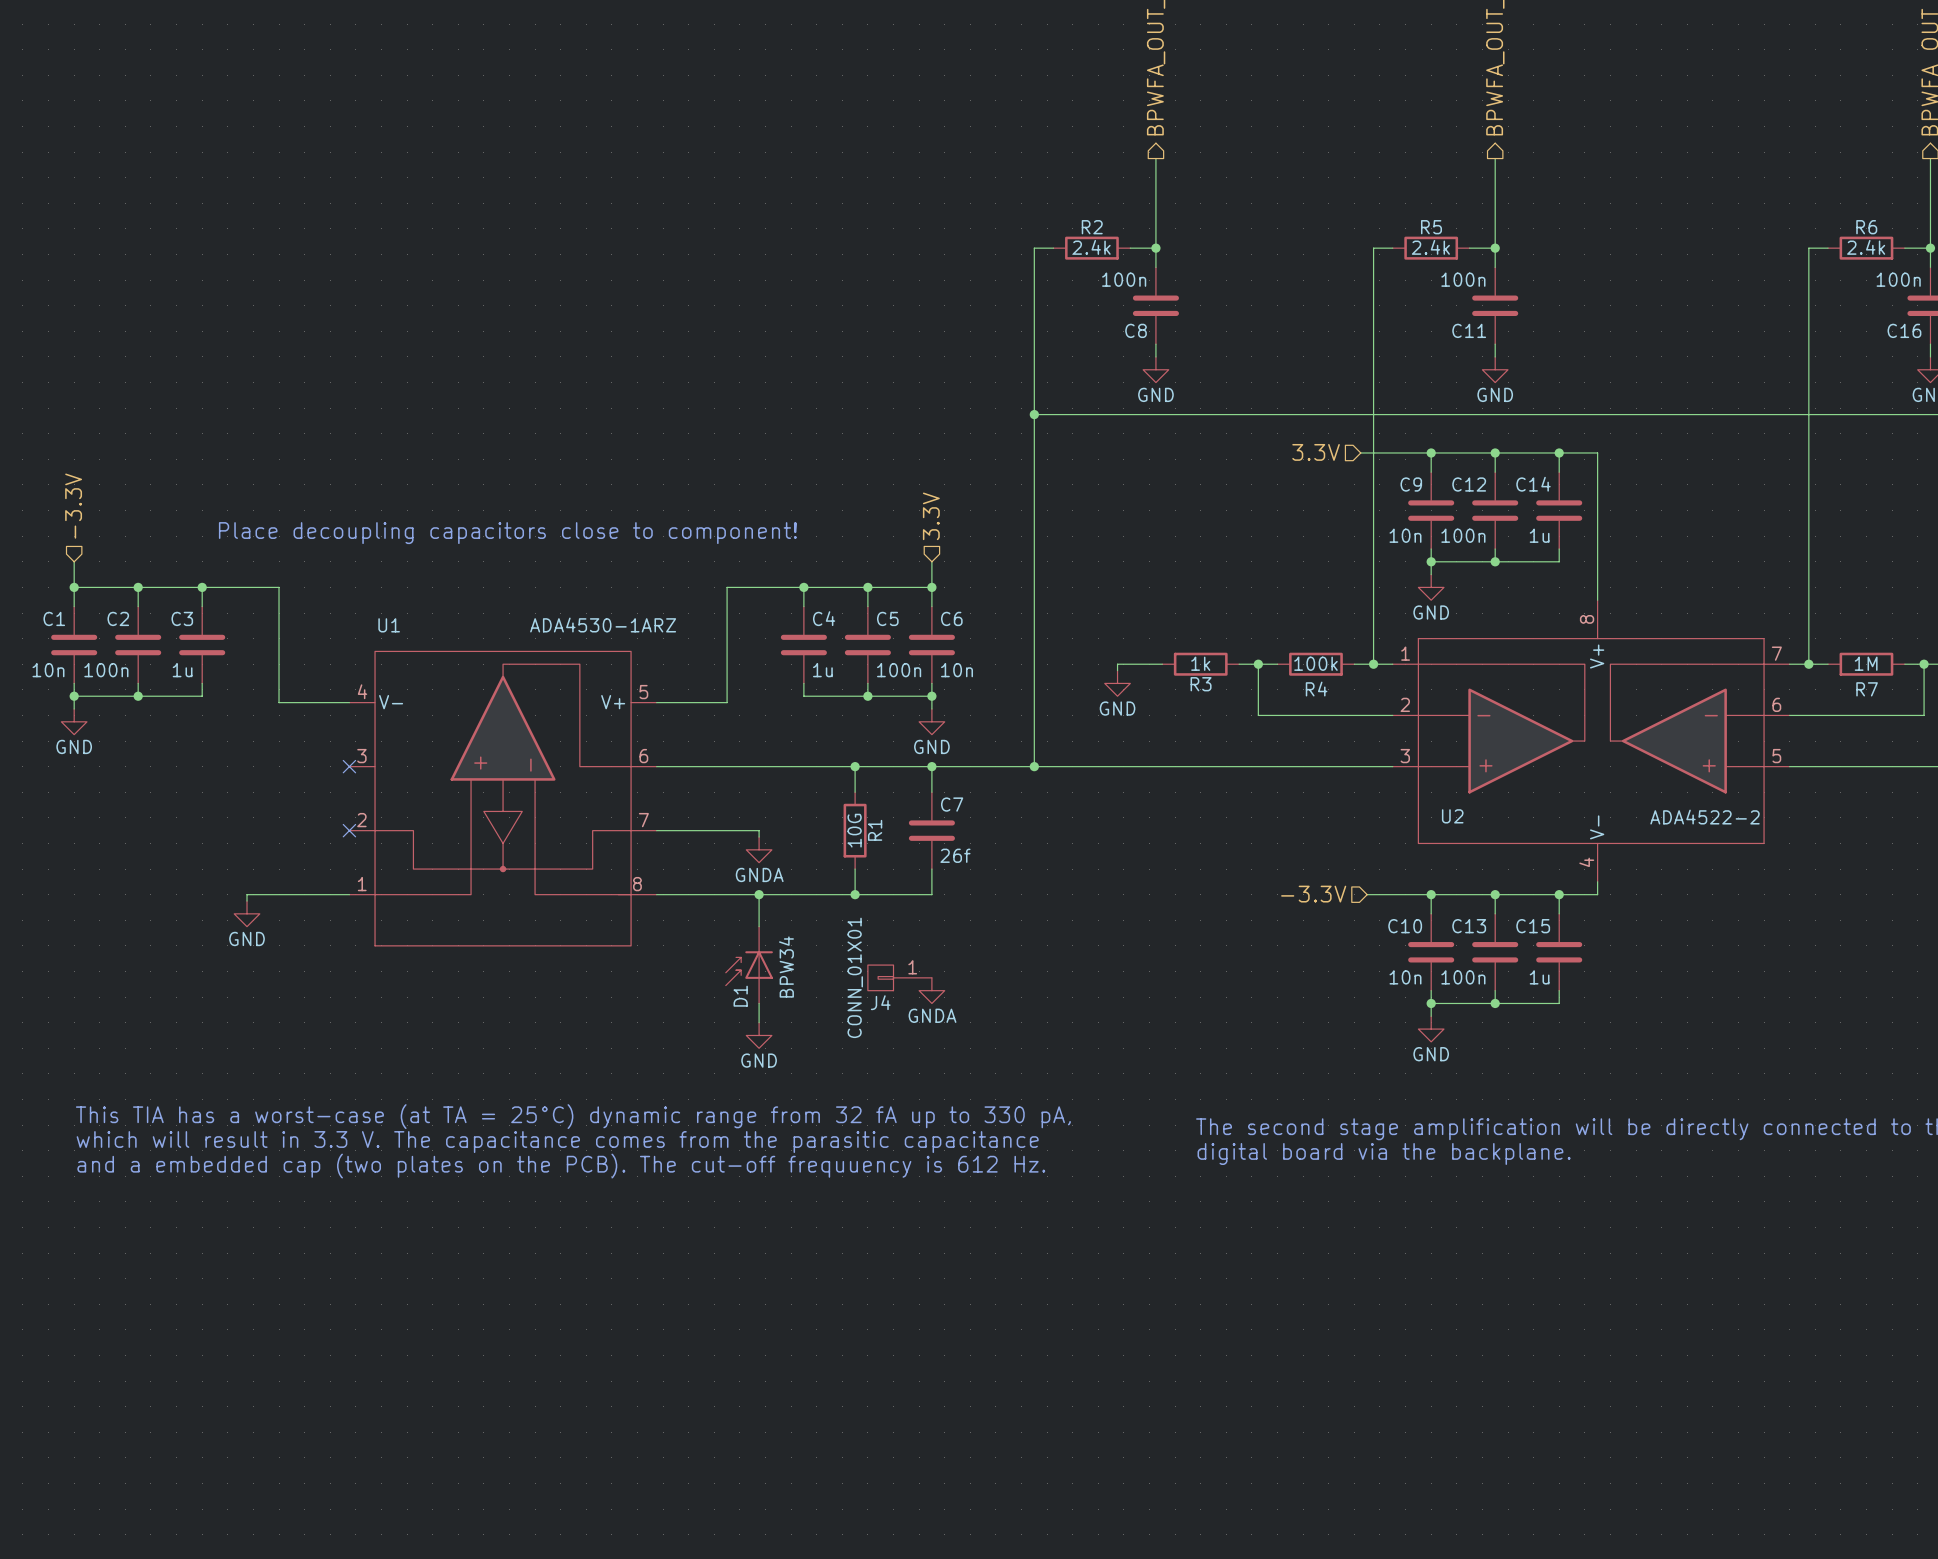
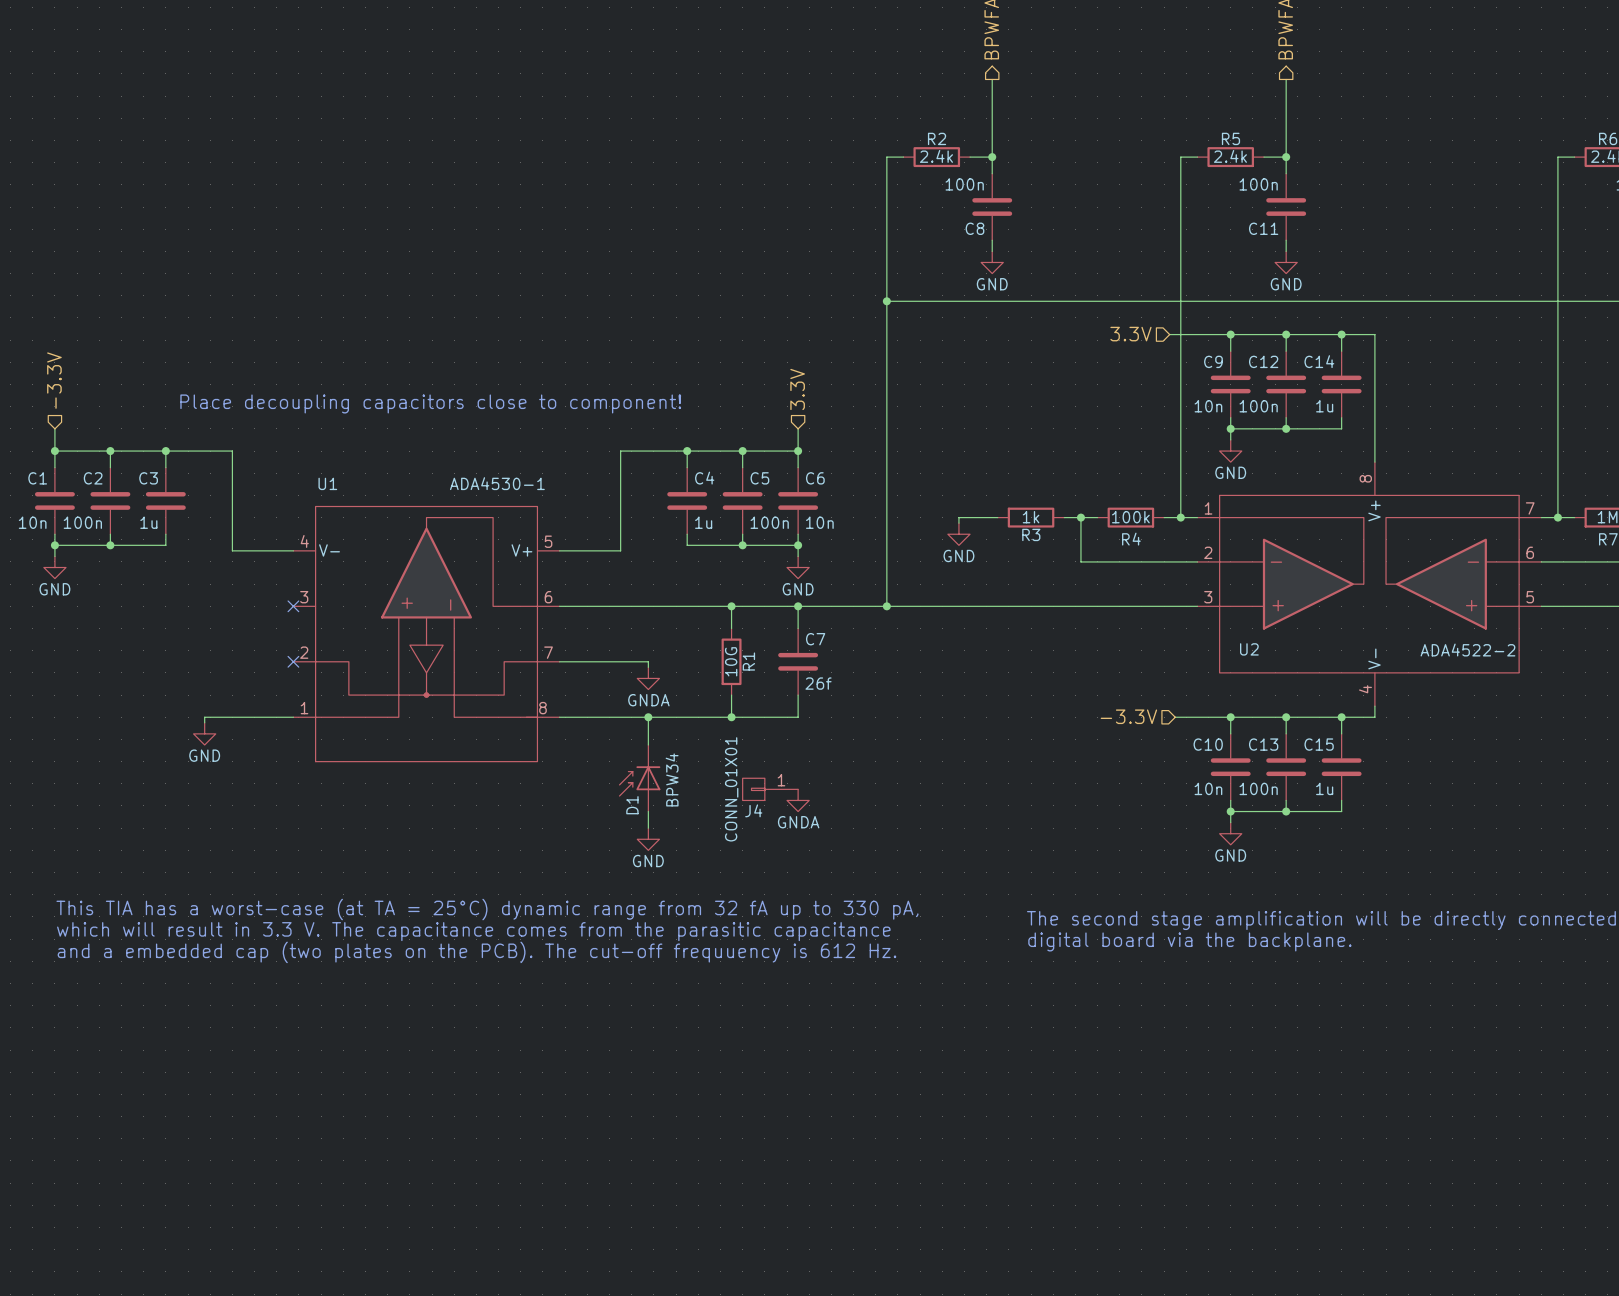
U1 value: ADA4530-1ARZ (603, 625) -> ADA4530-1 (497, 483)

